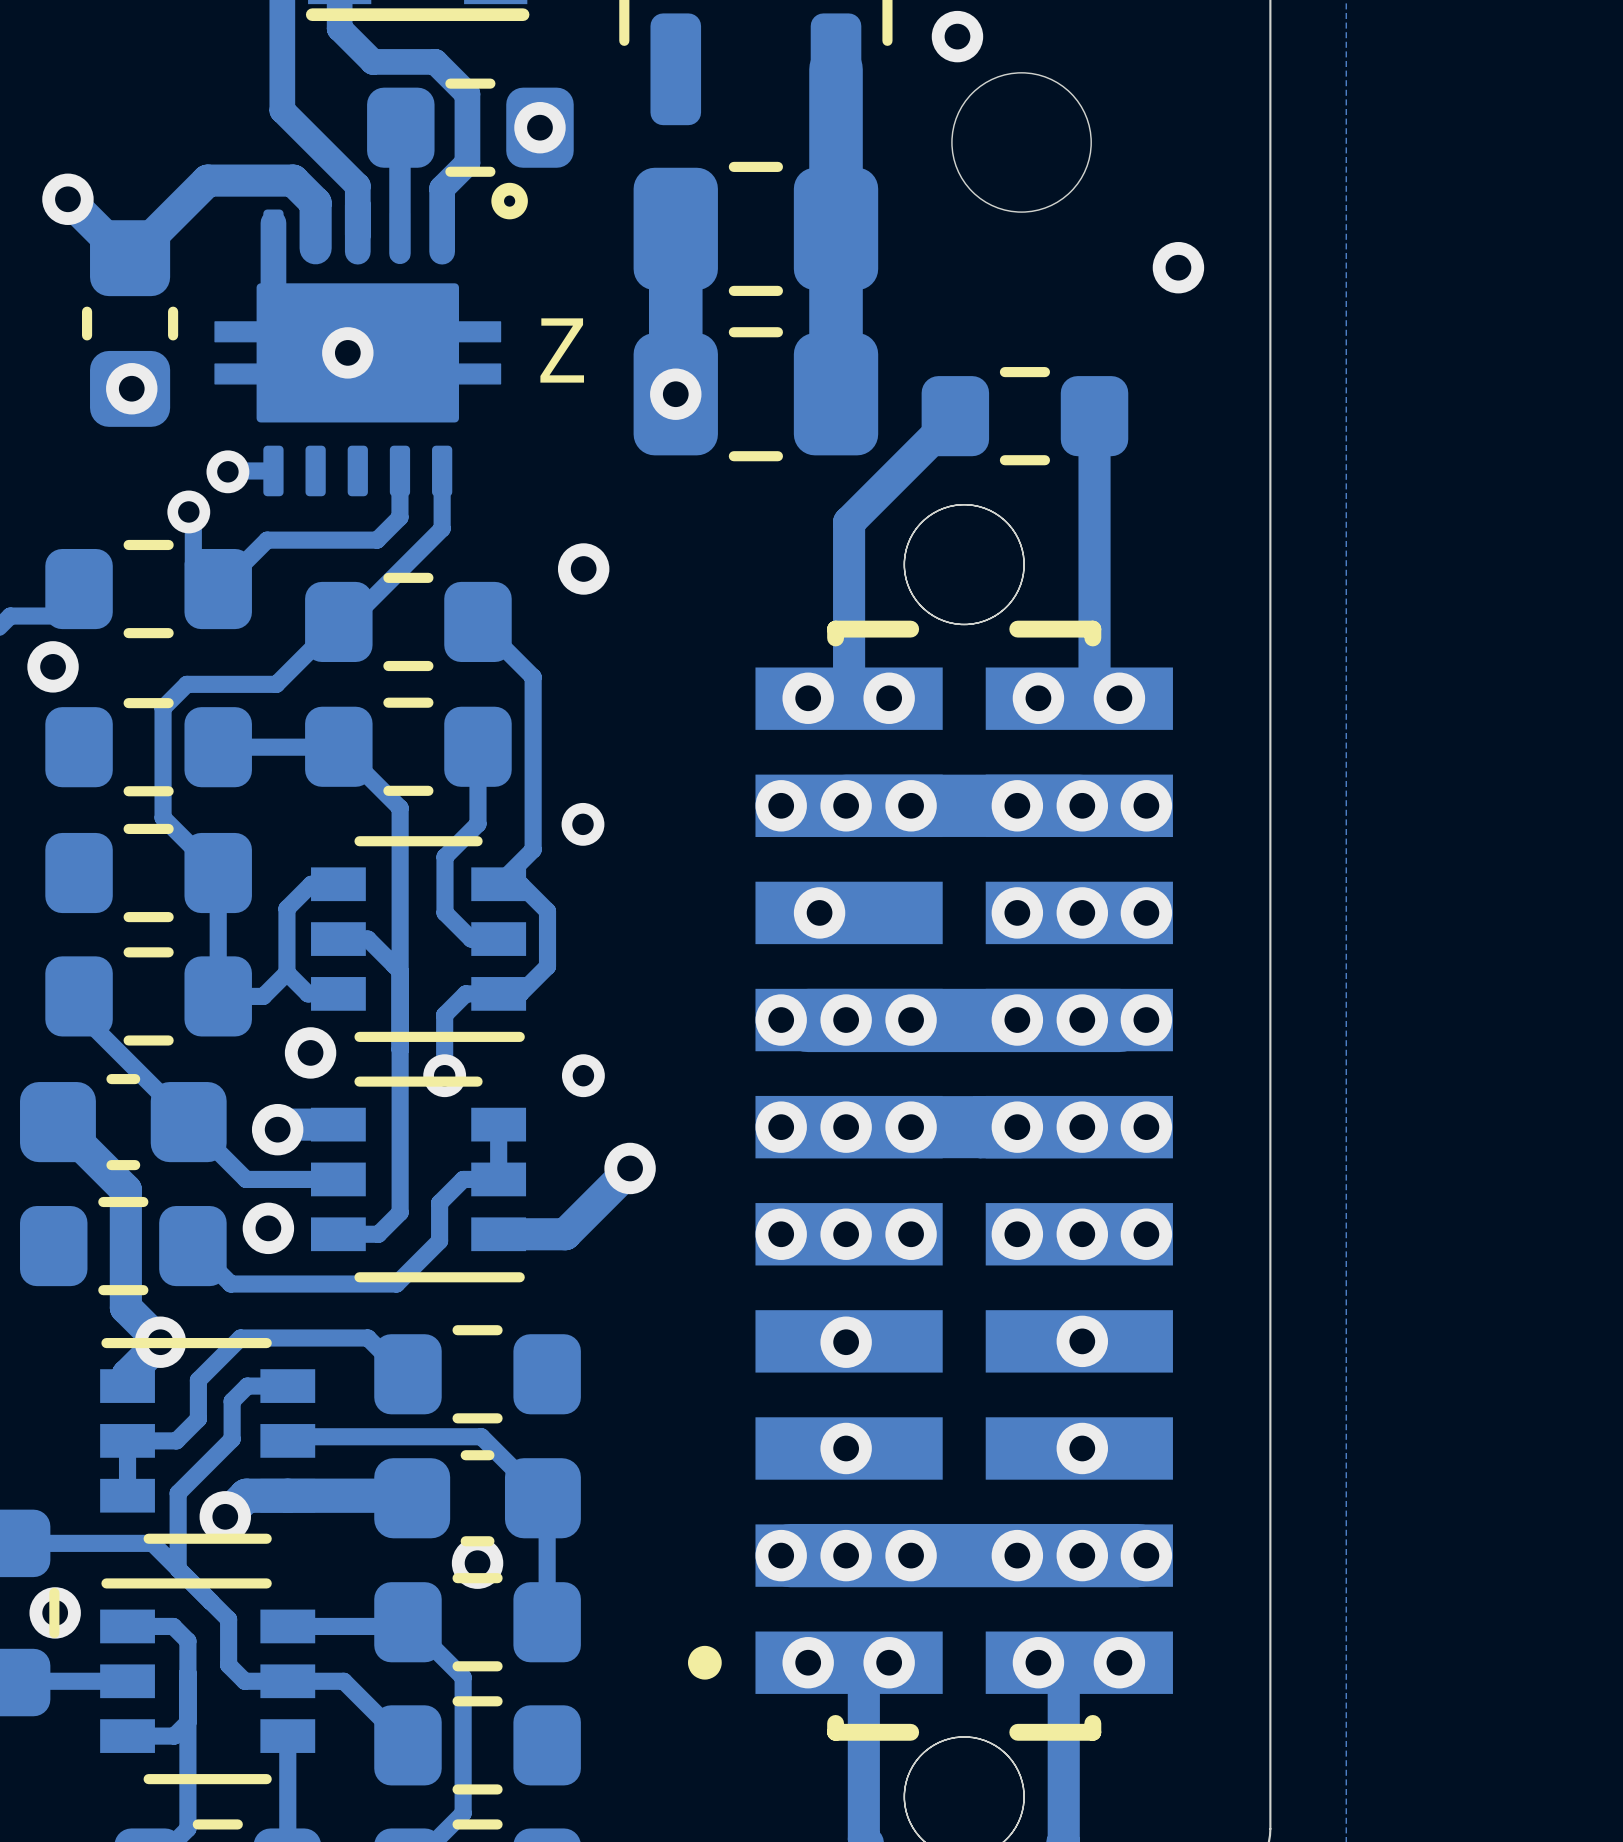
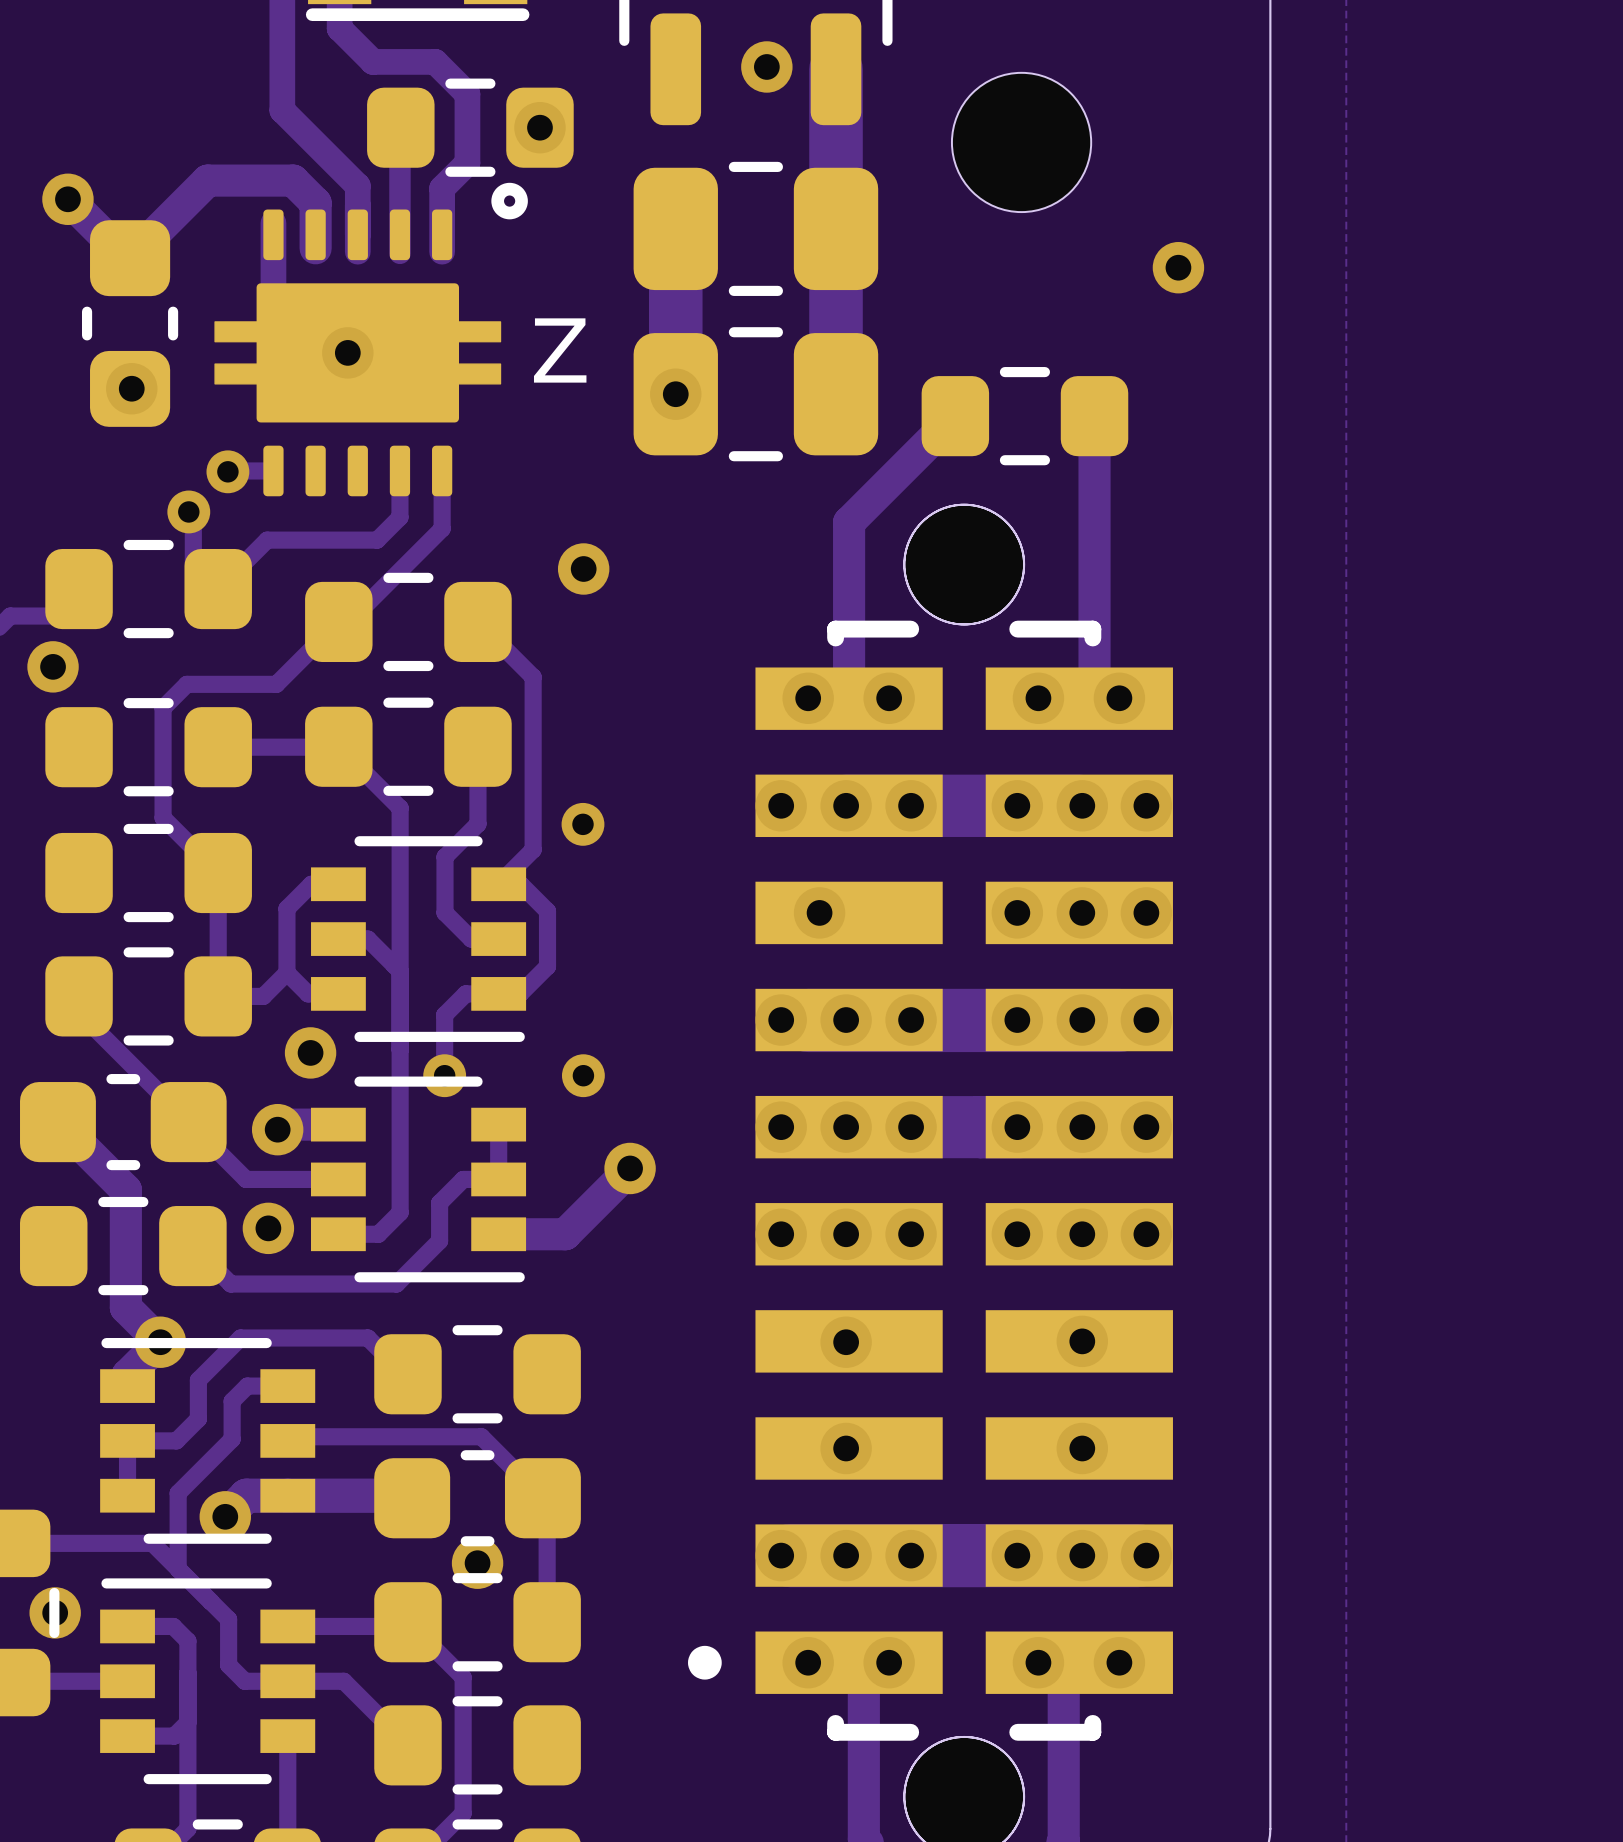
via: (957, 36) -> none
via: none -> (766, 66)

